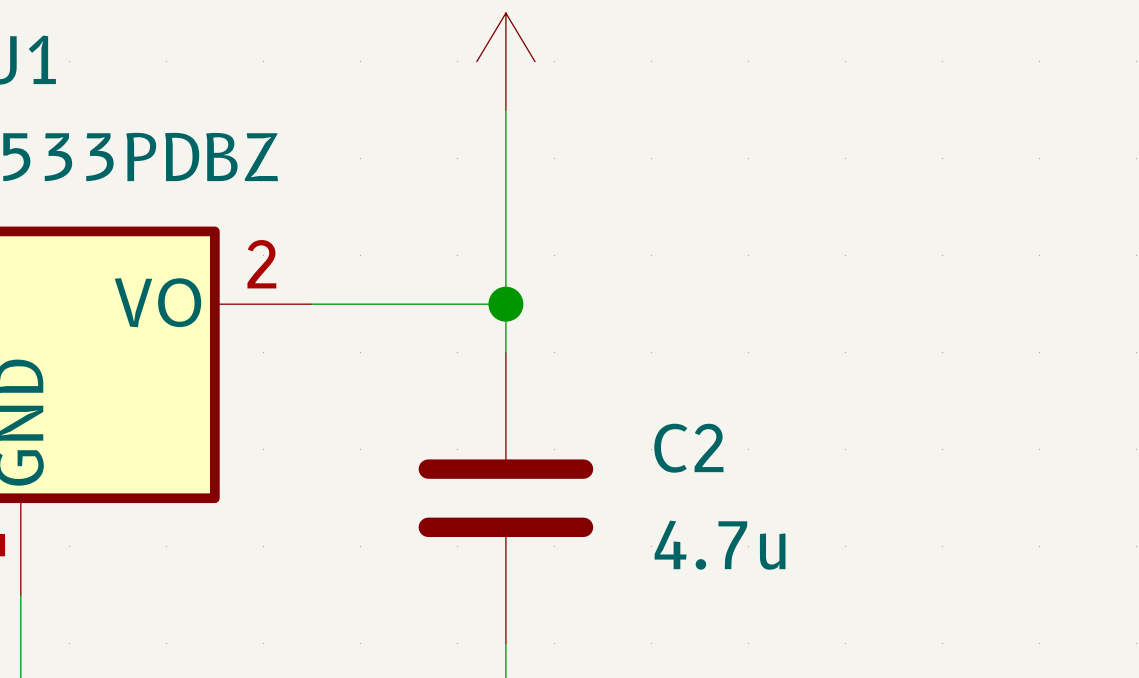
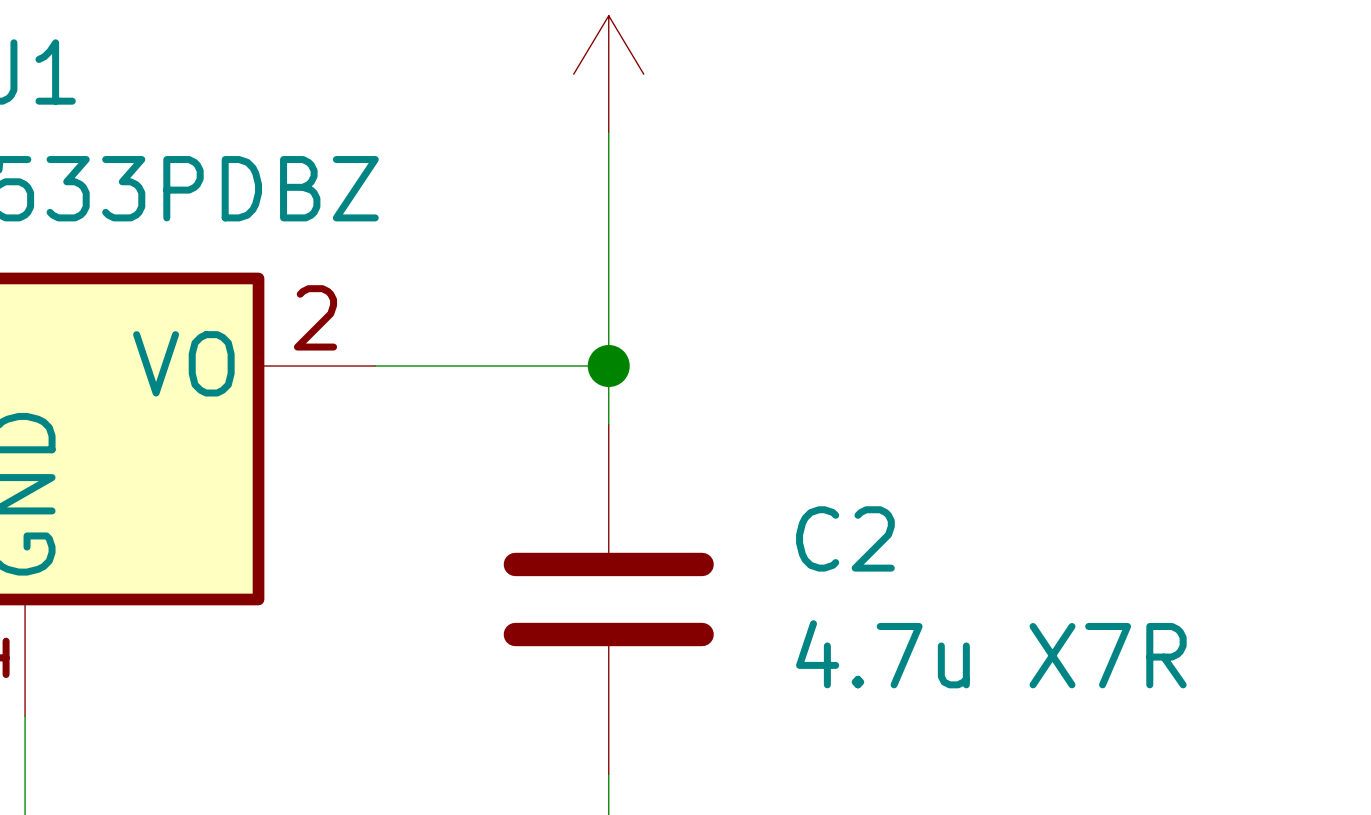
C2 value: 4.7u (720, 545) -> 4.7u X7R (991, 654)

